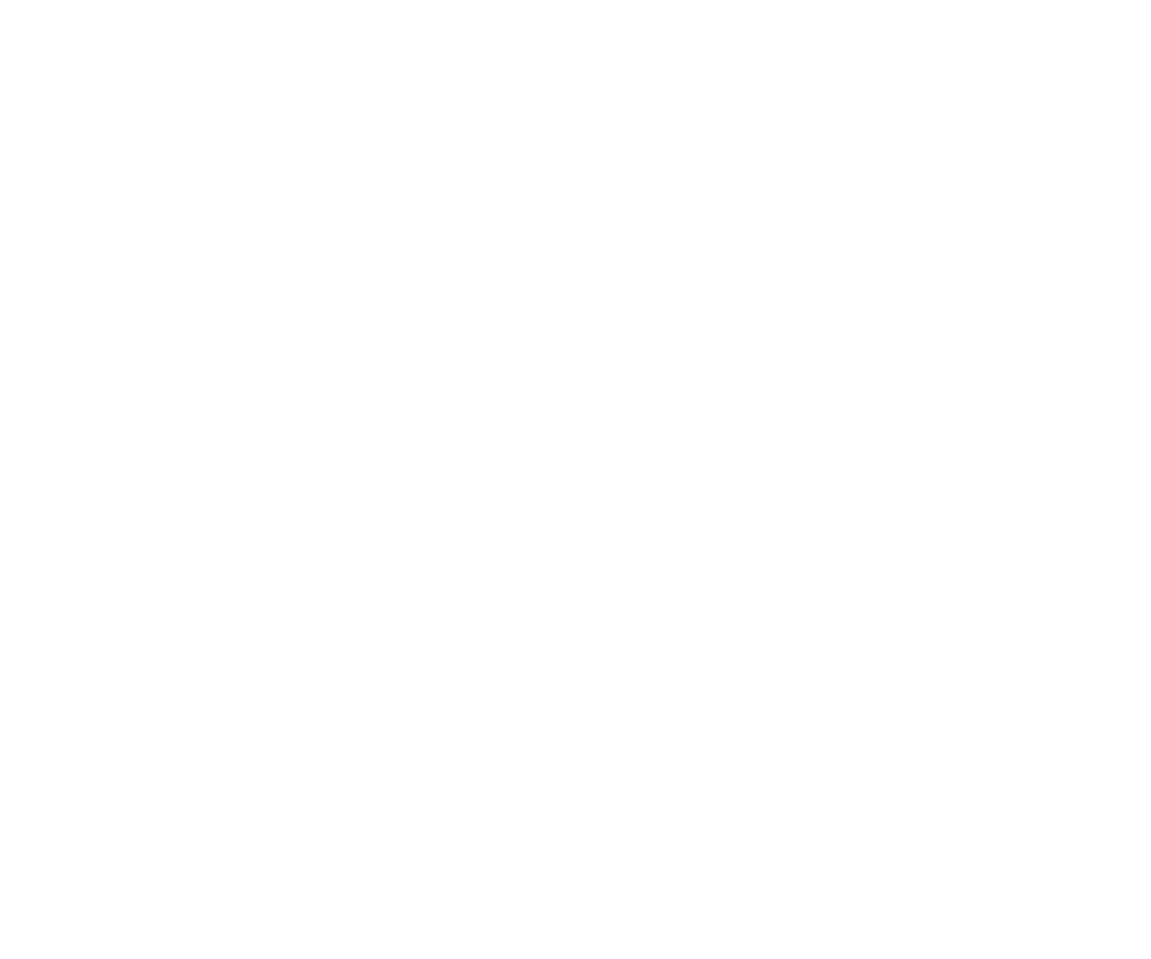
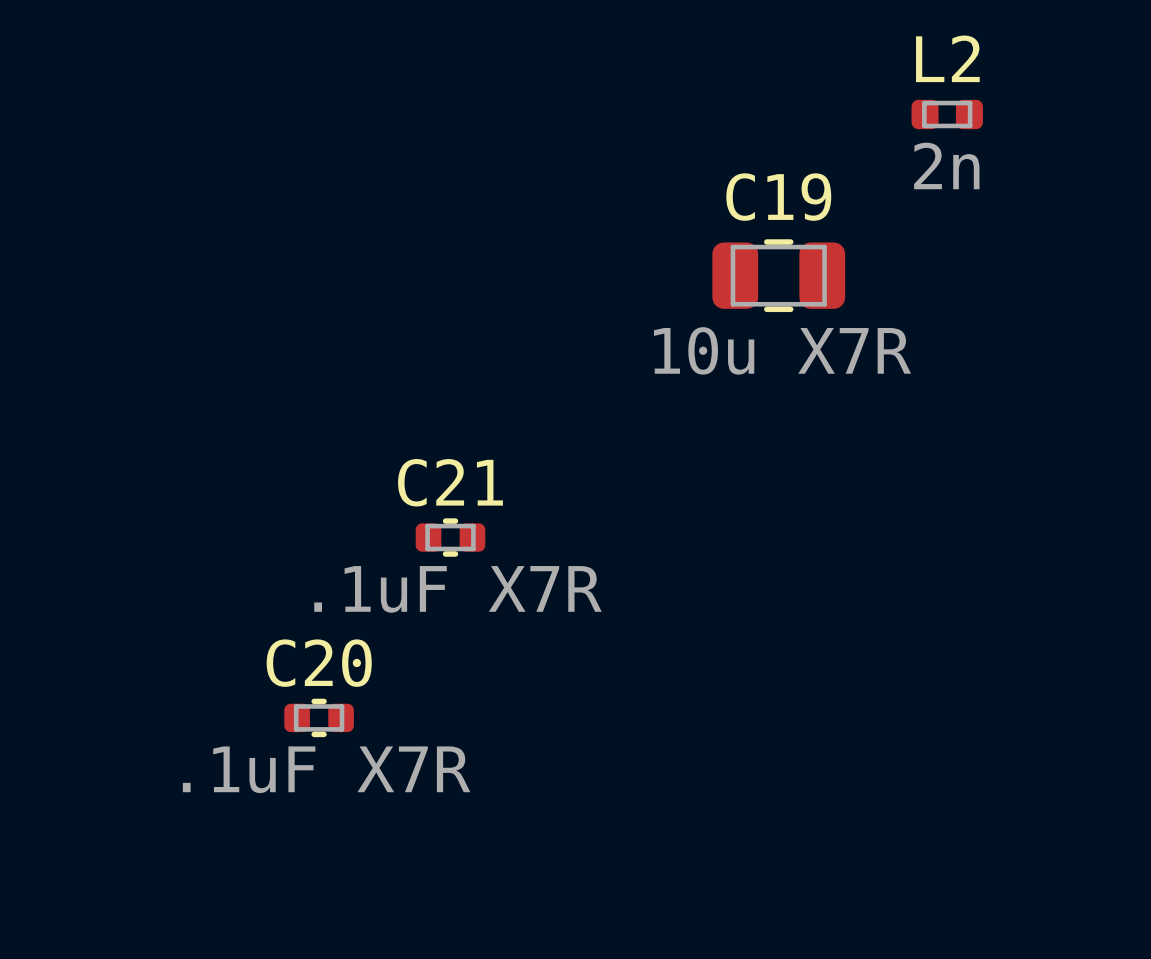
L2: none -> 2n (947, 114)
C19: none -> 10u X7R (778, 275)
C21: none -> .1uF X7R (450, 537)
C20: none -> .1uF X7R (319, 717)

